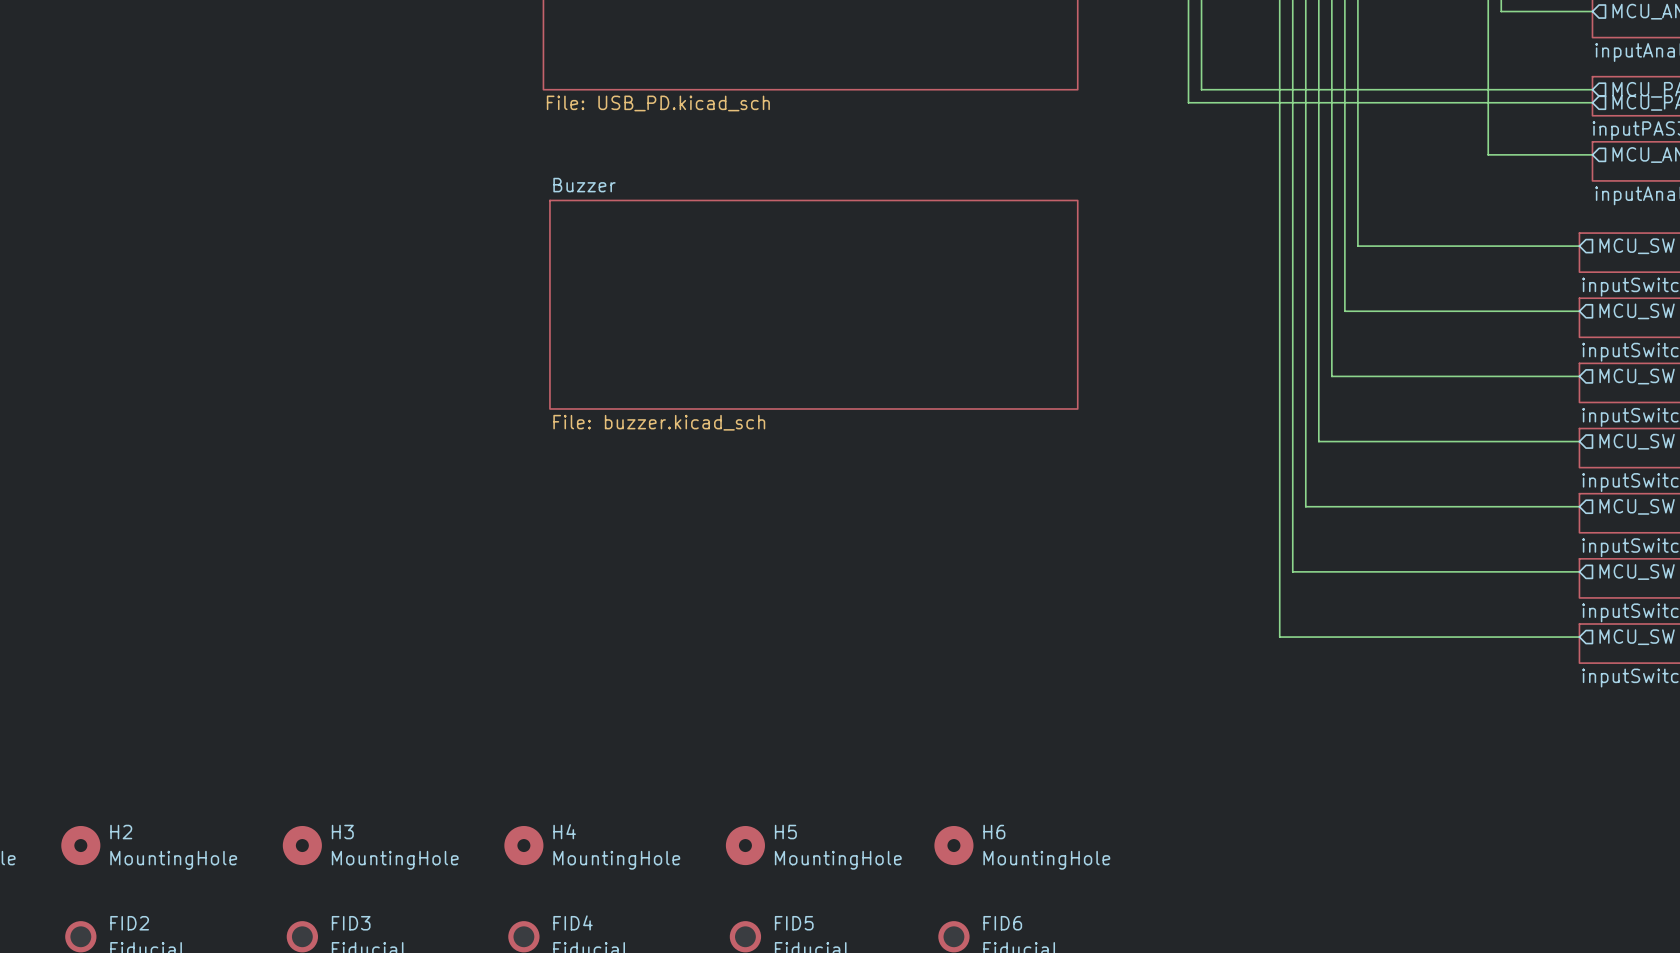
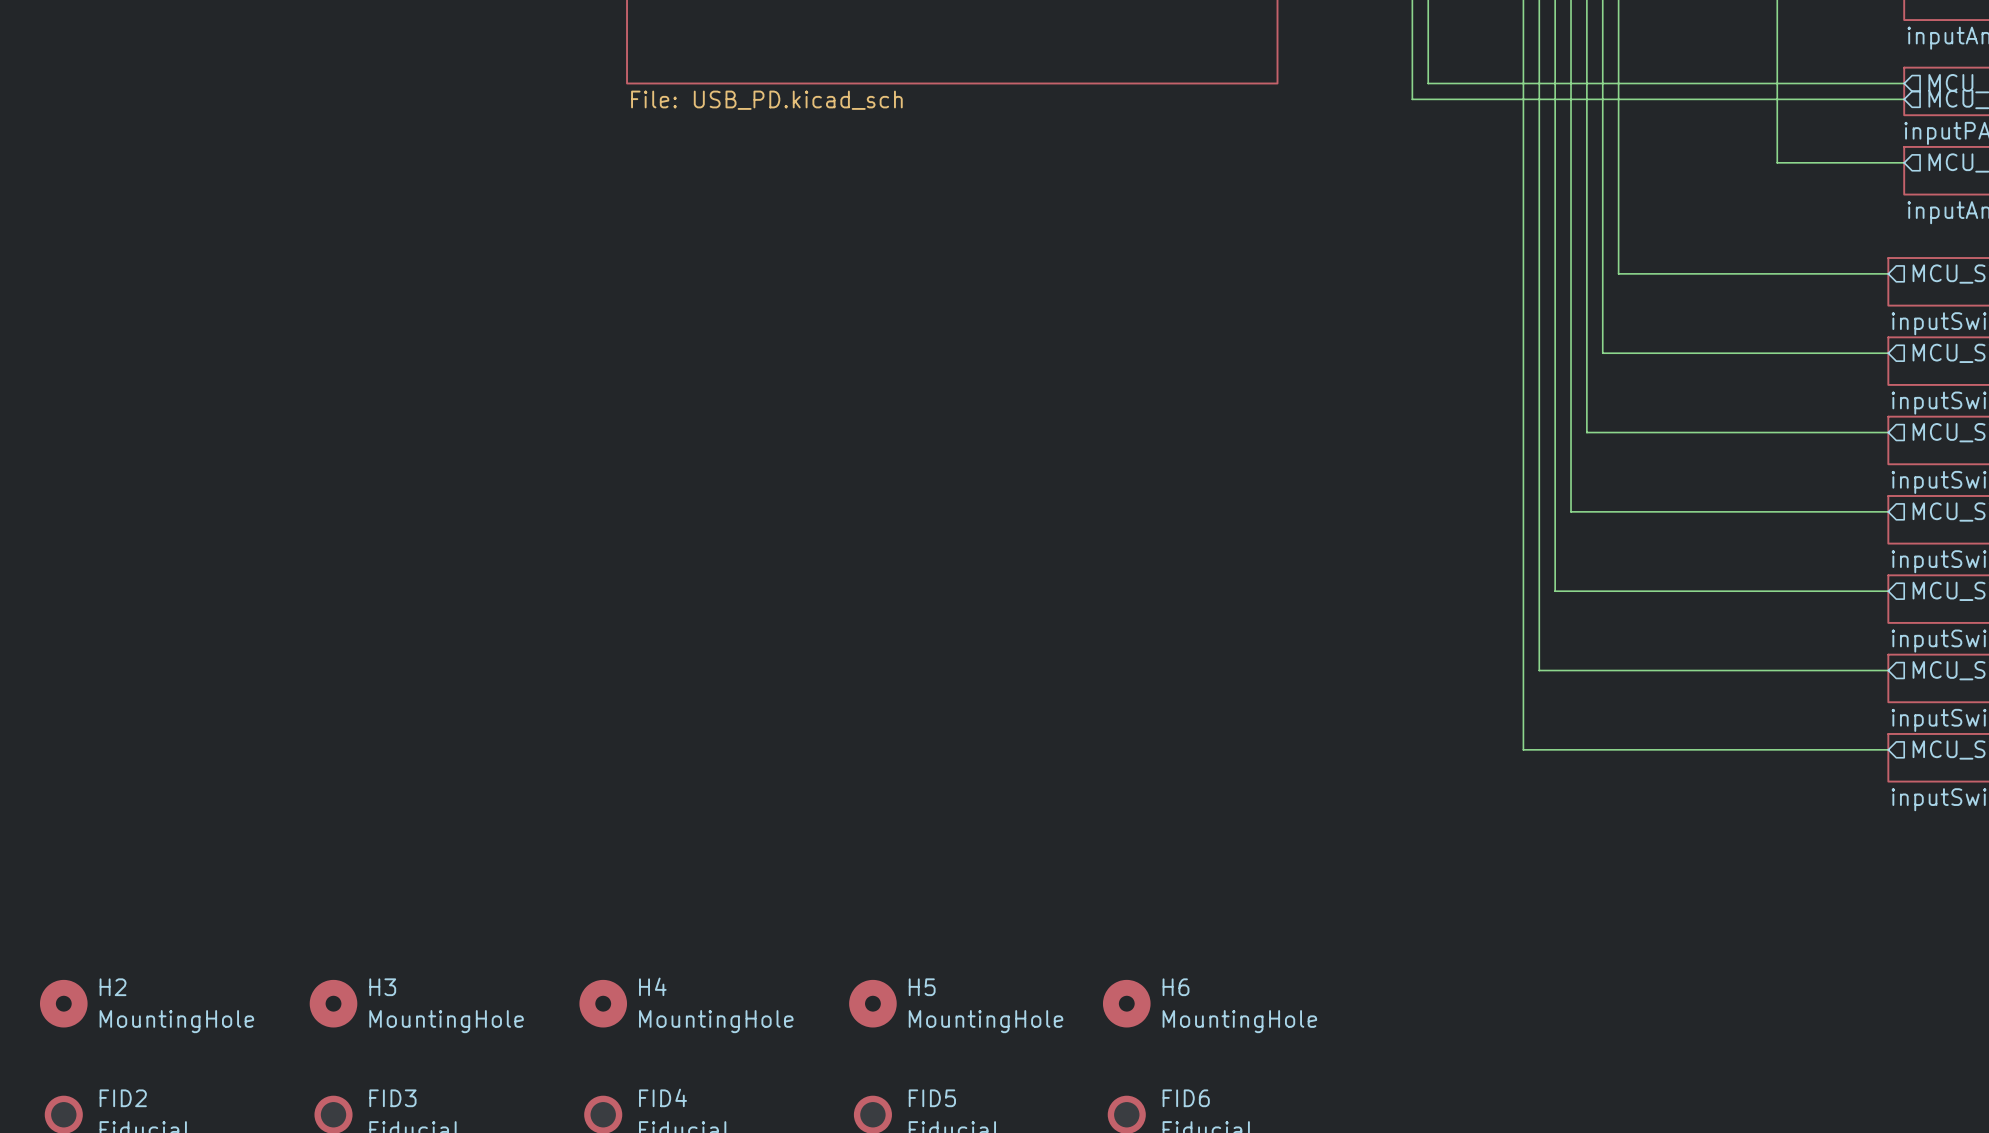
sheet Buzzer: File: buzzer.kicad_sch (813, 304) -> none

